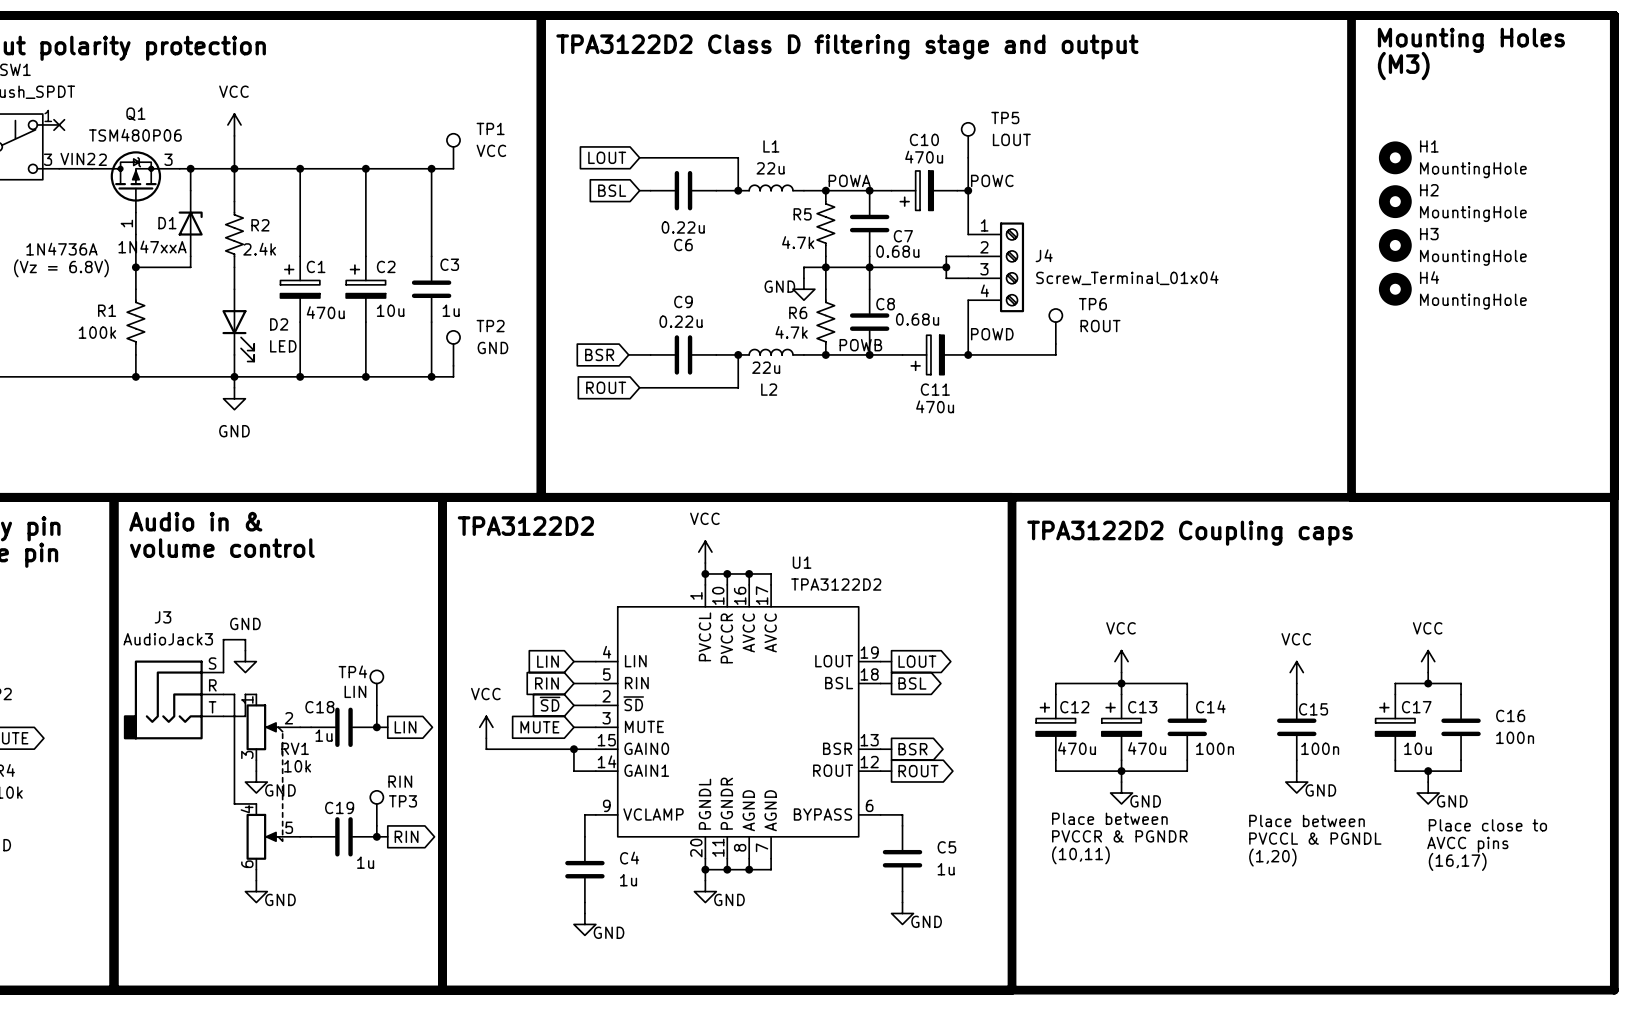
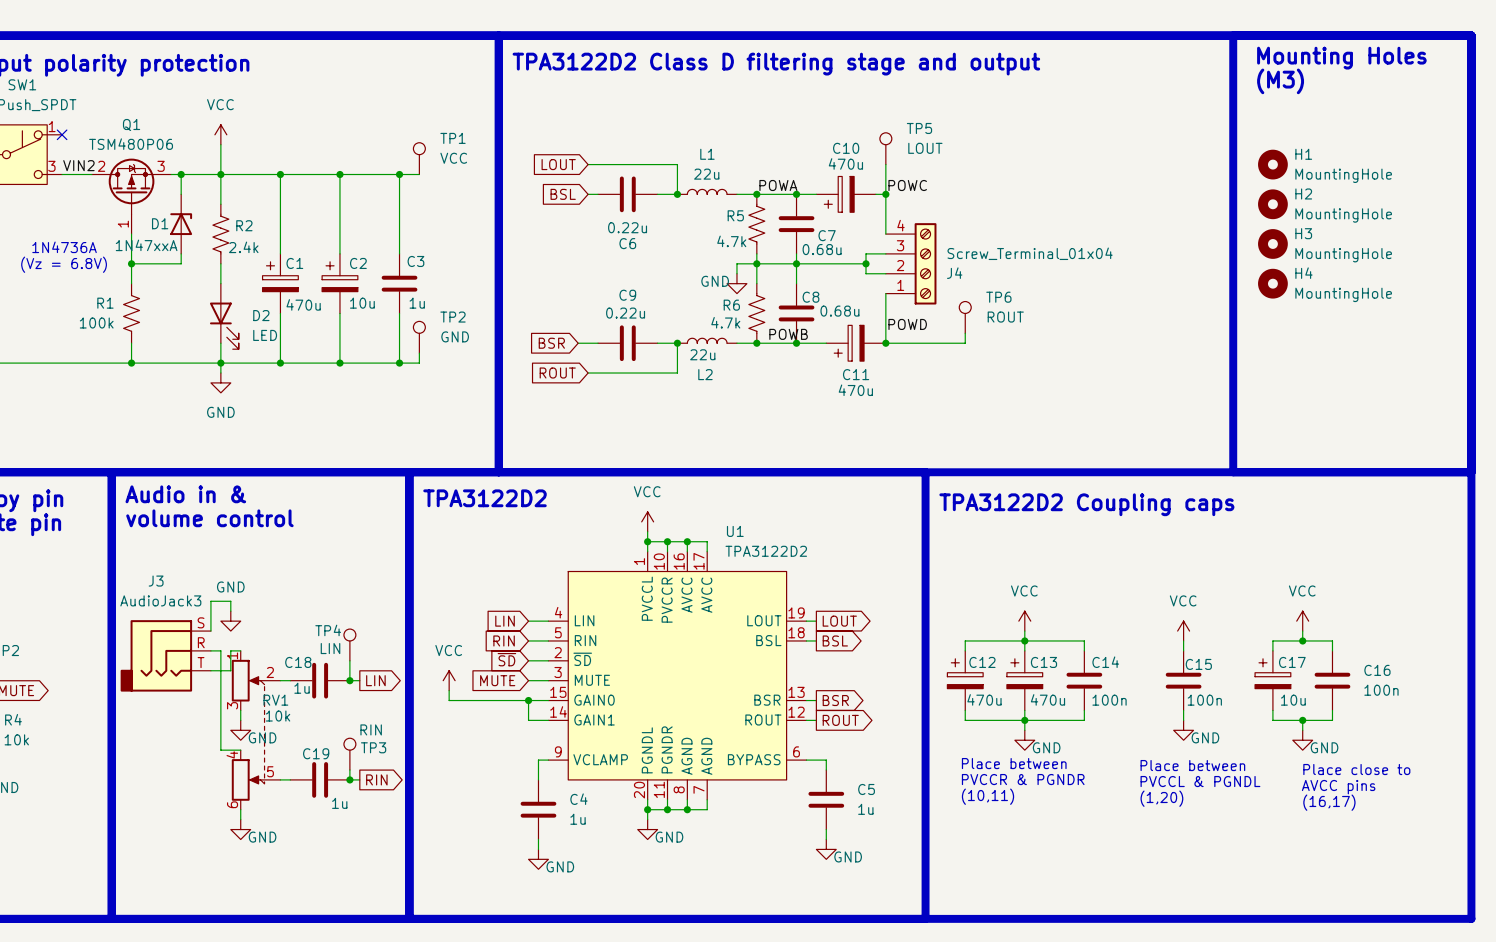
J4 flip: as is (1012, 267) -> up-down (925, 263)

